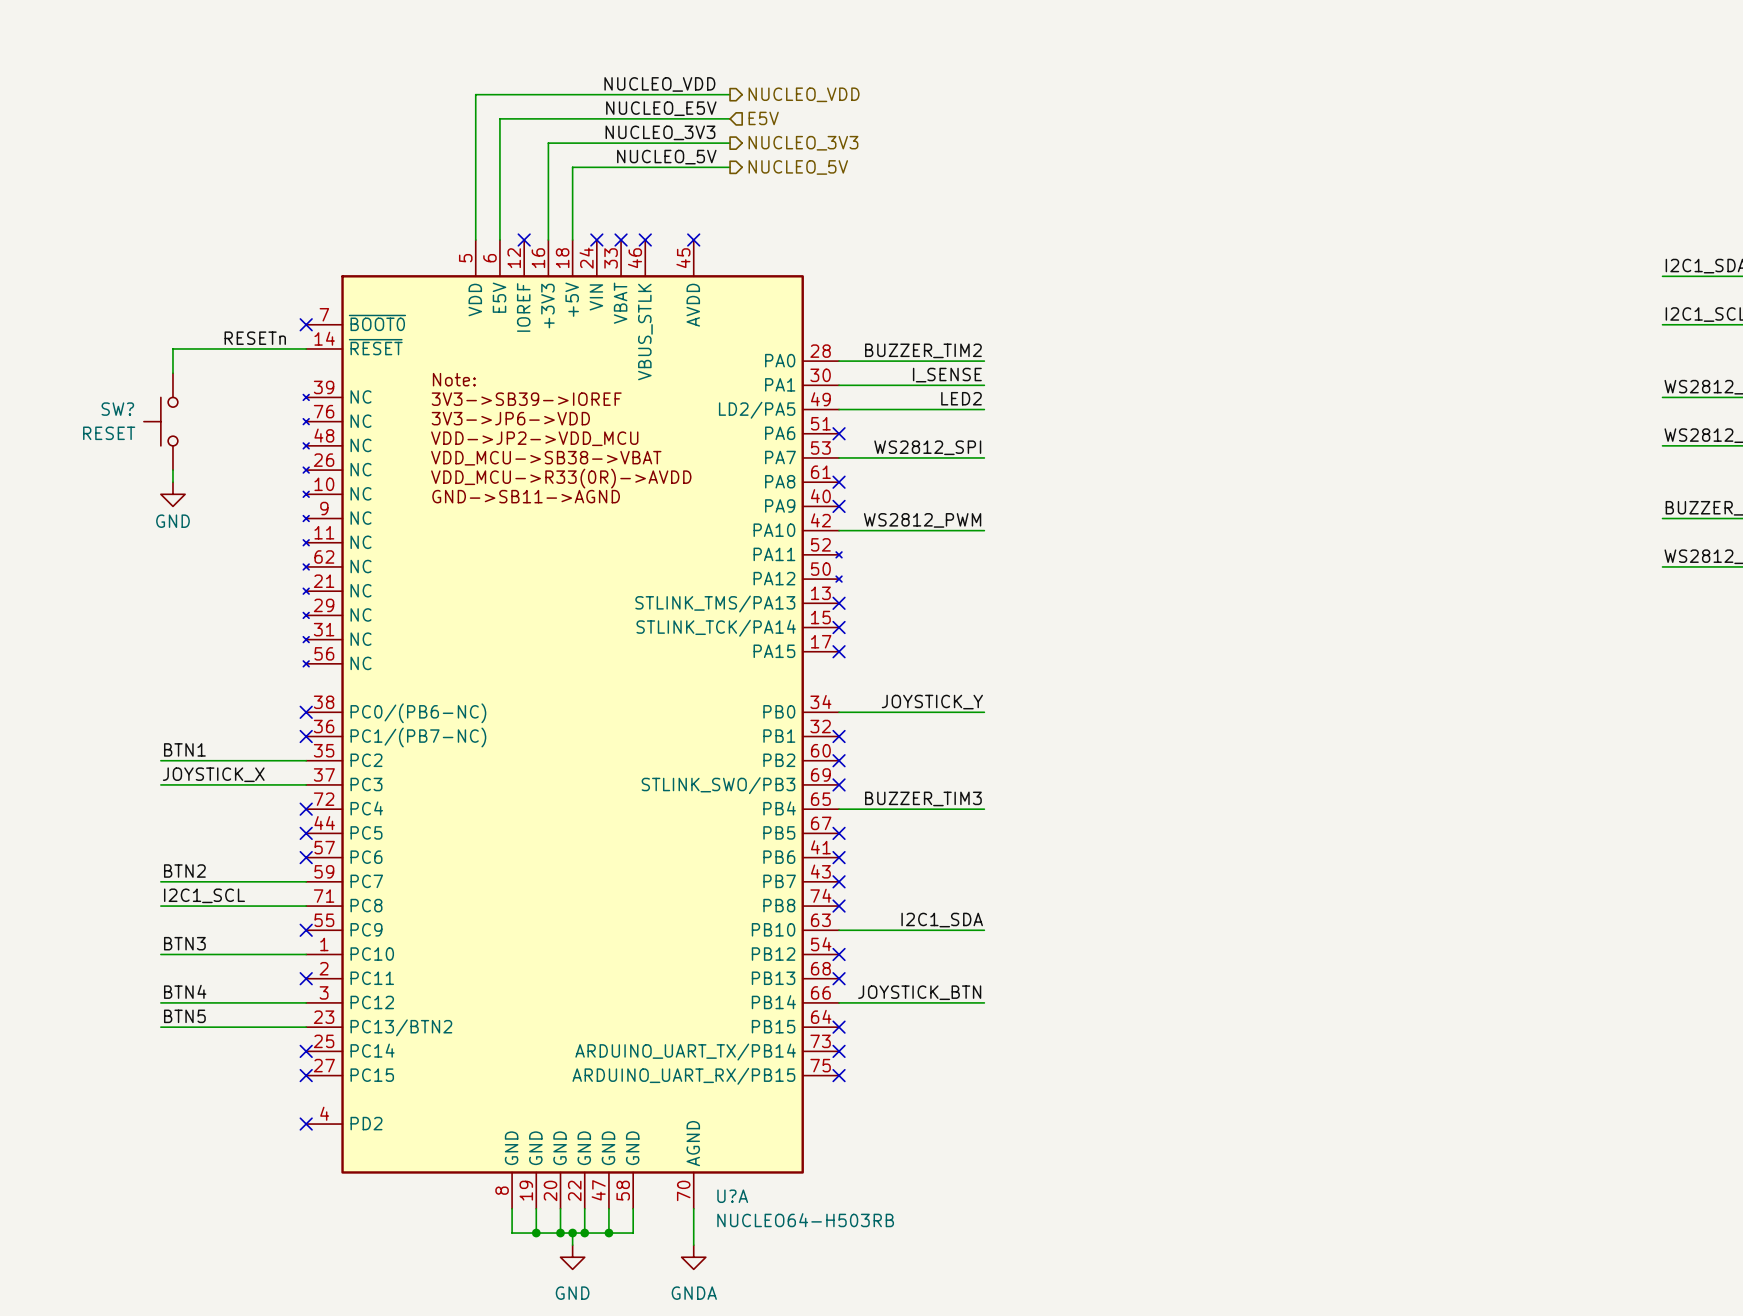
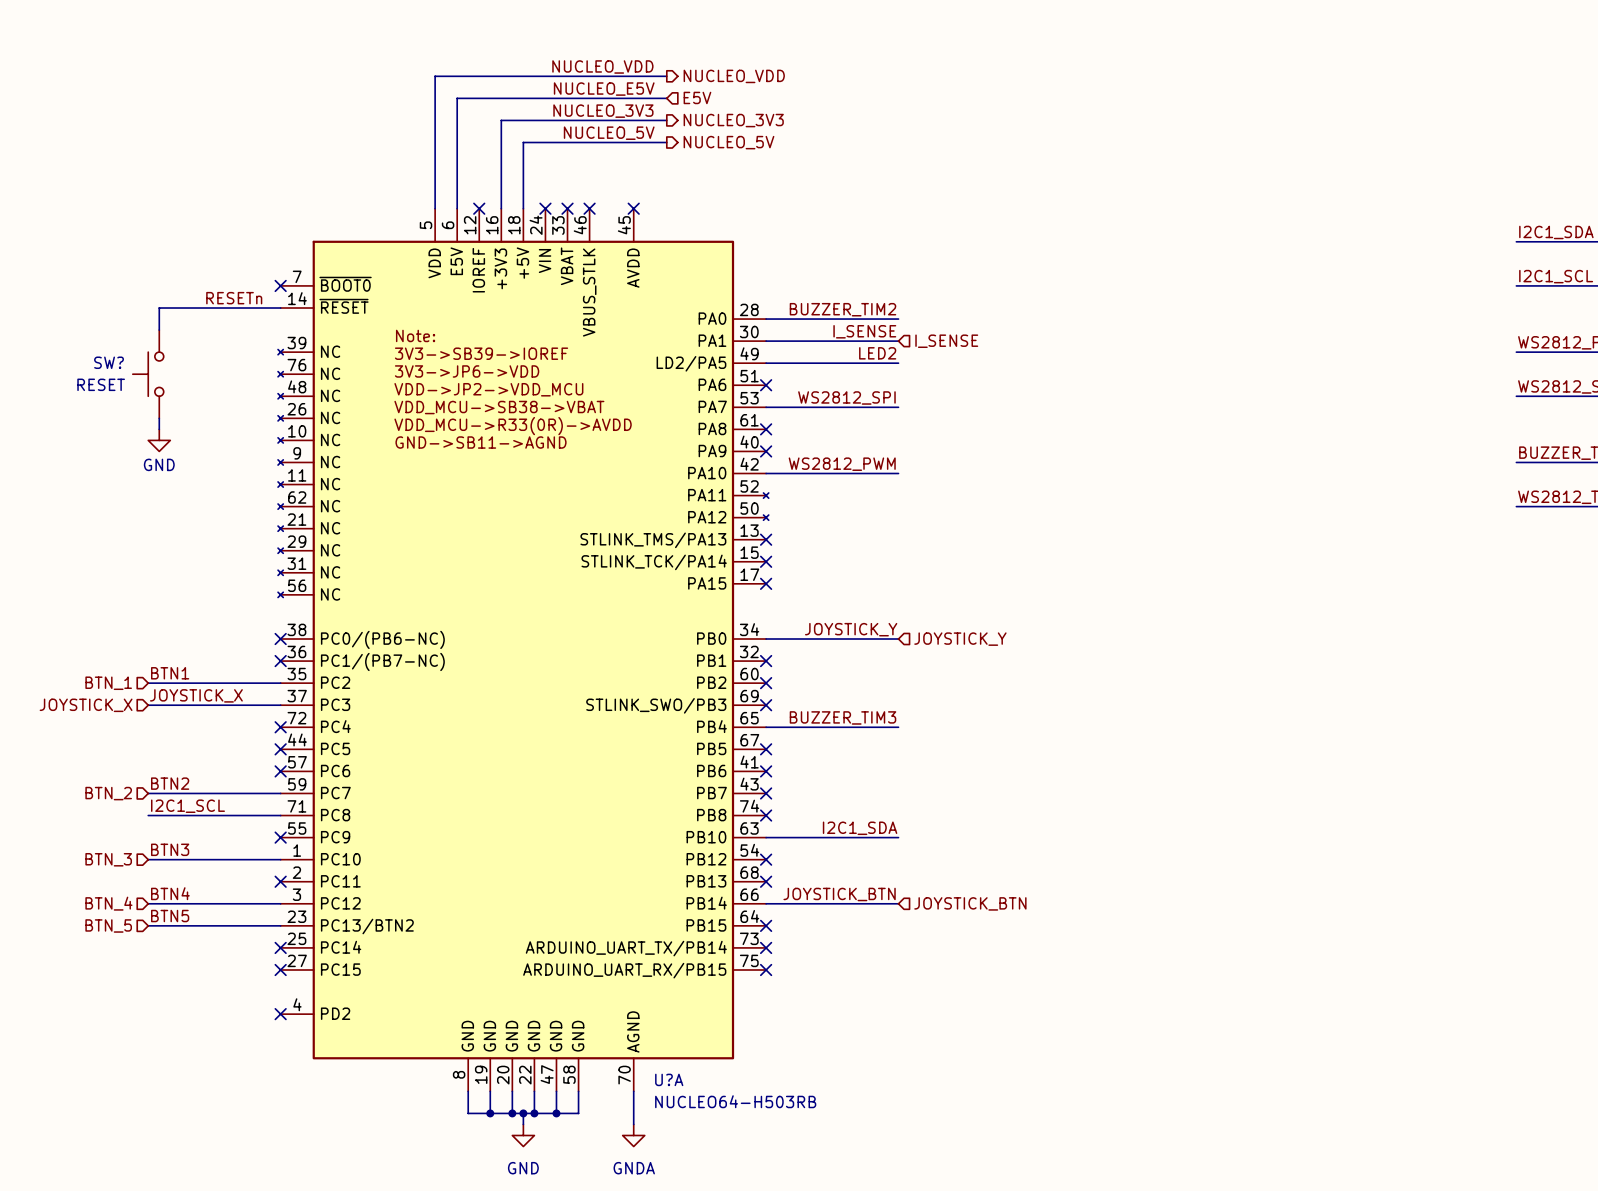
hierarchical label: none -> I_SENSE (946, 341)
hierarchical label: none -> JOYSTICK_Y (960, 639)
hierarchical label: none -> BTN_1 (108, 683)
hierarchical label: none -> JOYSTICK_X (86, 705)
hierarchical label: none -> BTN_2 (108, 793)
hierarchical label: none -> BTN_3 (108, 859)
hierarchical label: none -> BTN_4 (108, 903)
hierarchical label: none -> JOYSTICK_BTN (970, 903)
hierarchical label: none -> BTN_5 (108, 925)

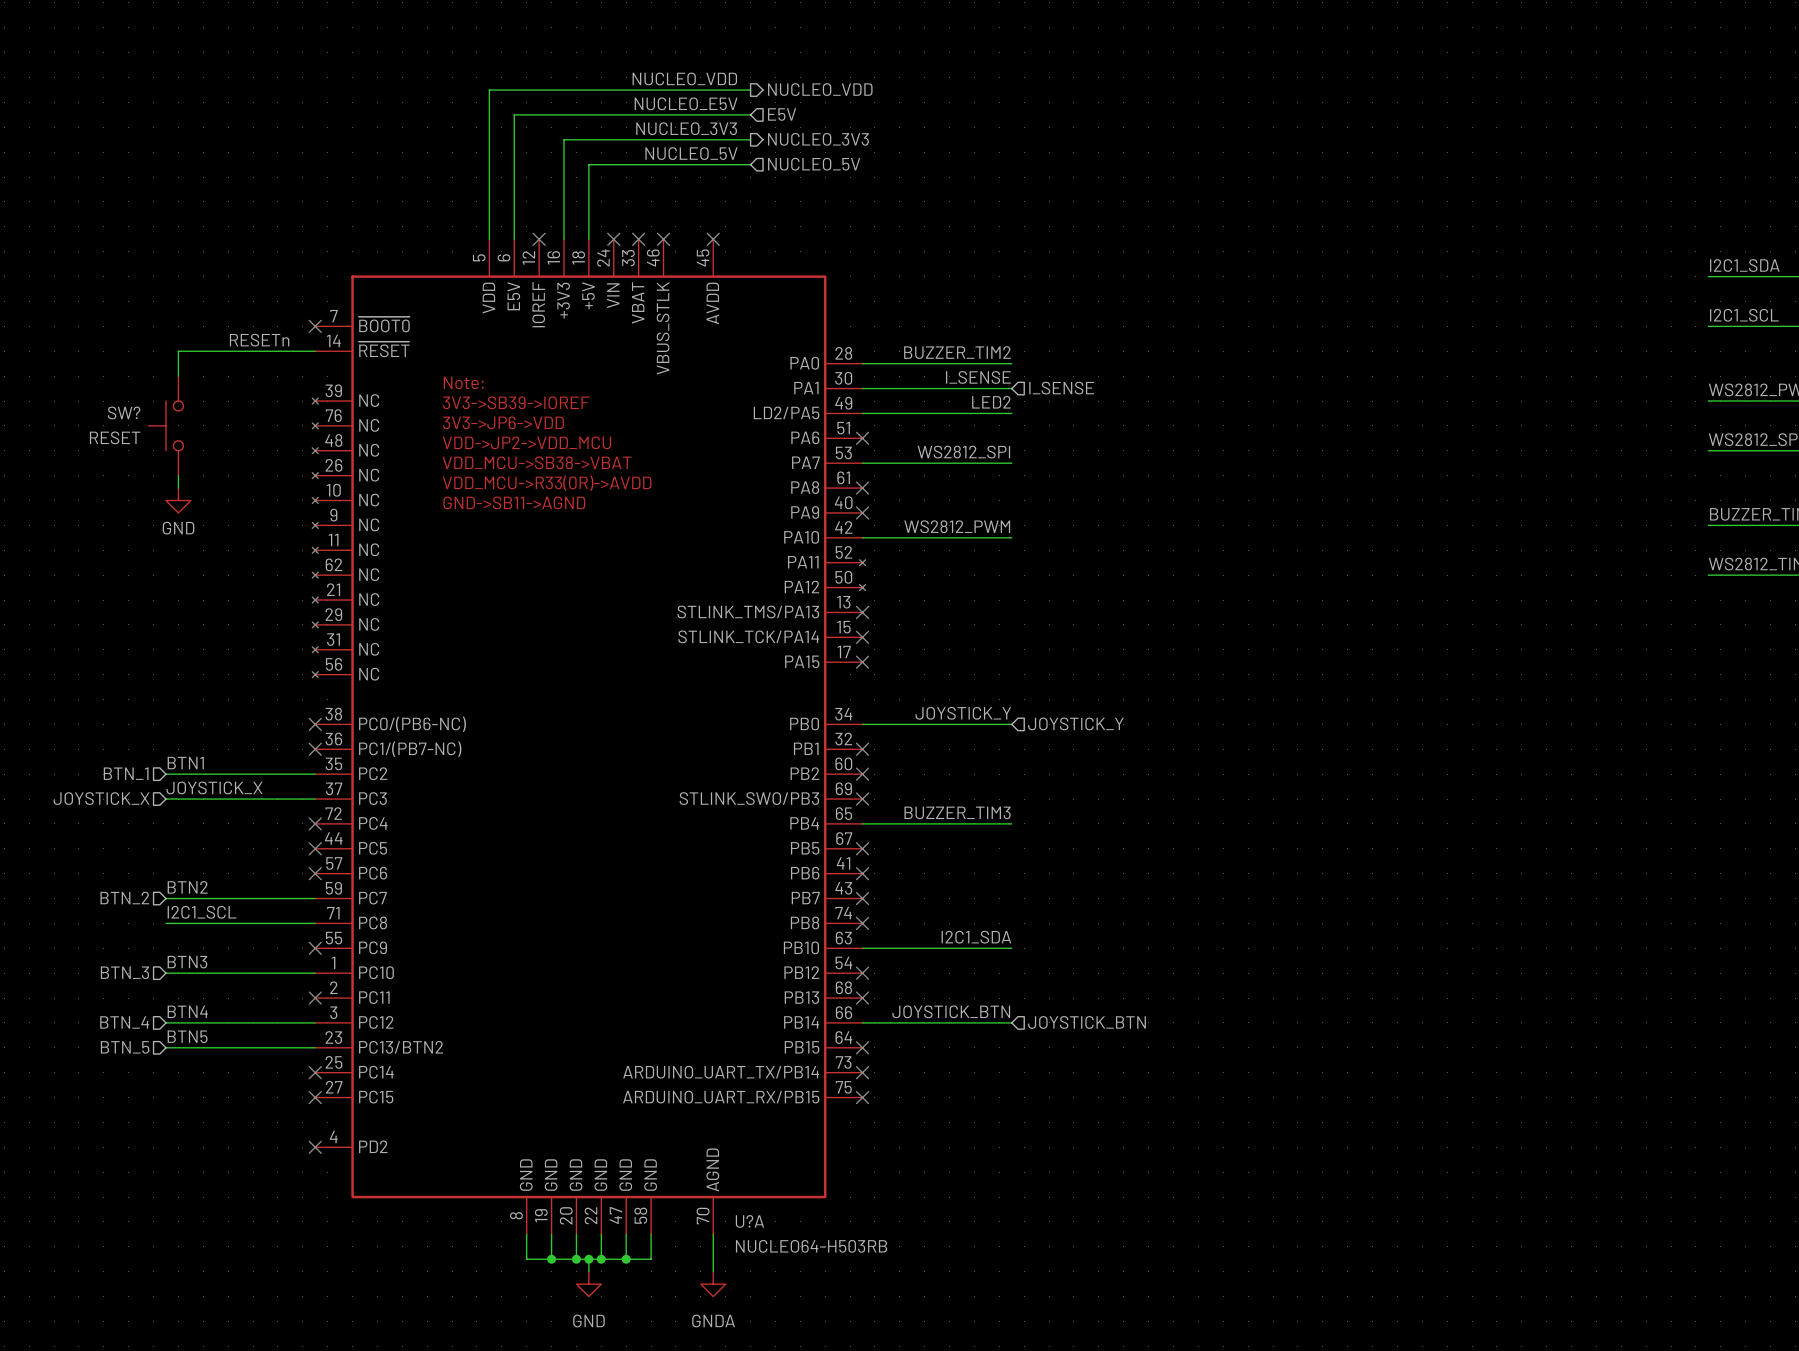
hierarchical label shape: output (728, 142) -> input (814, 164)

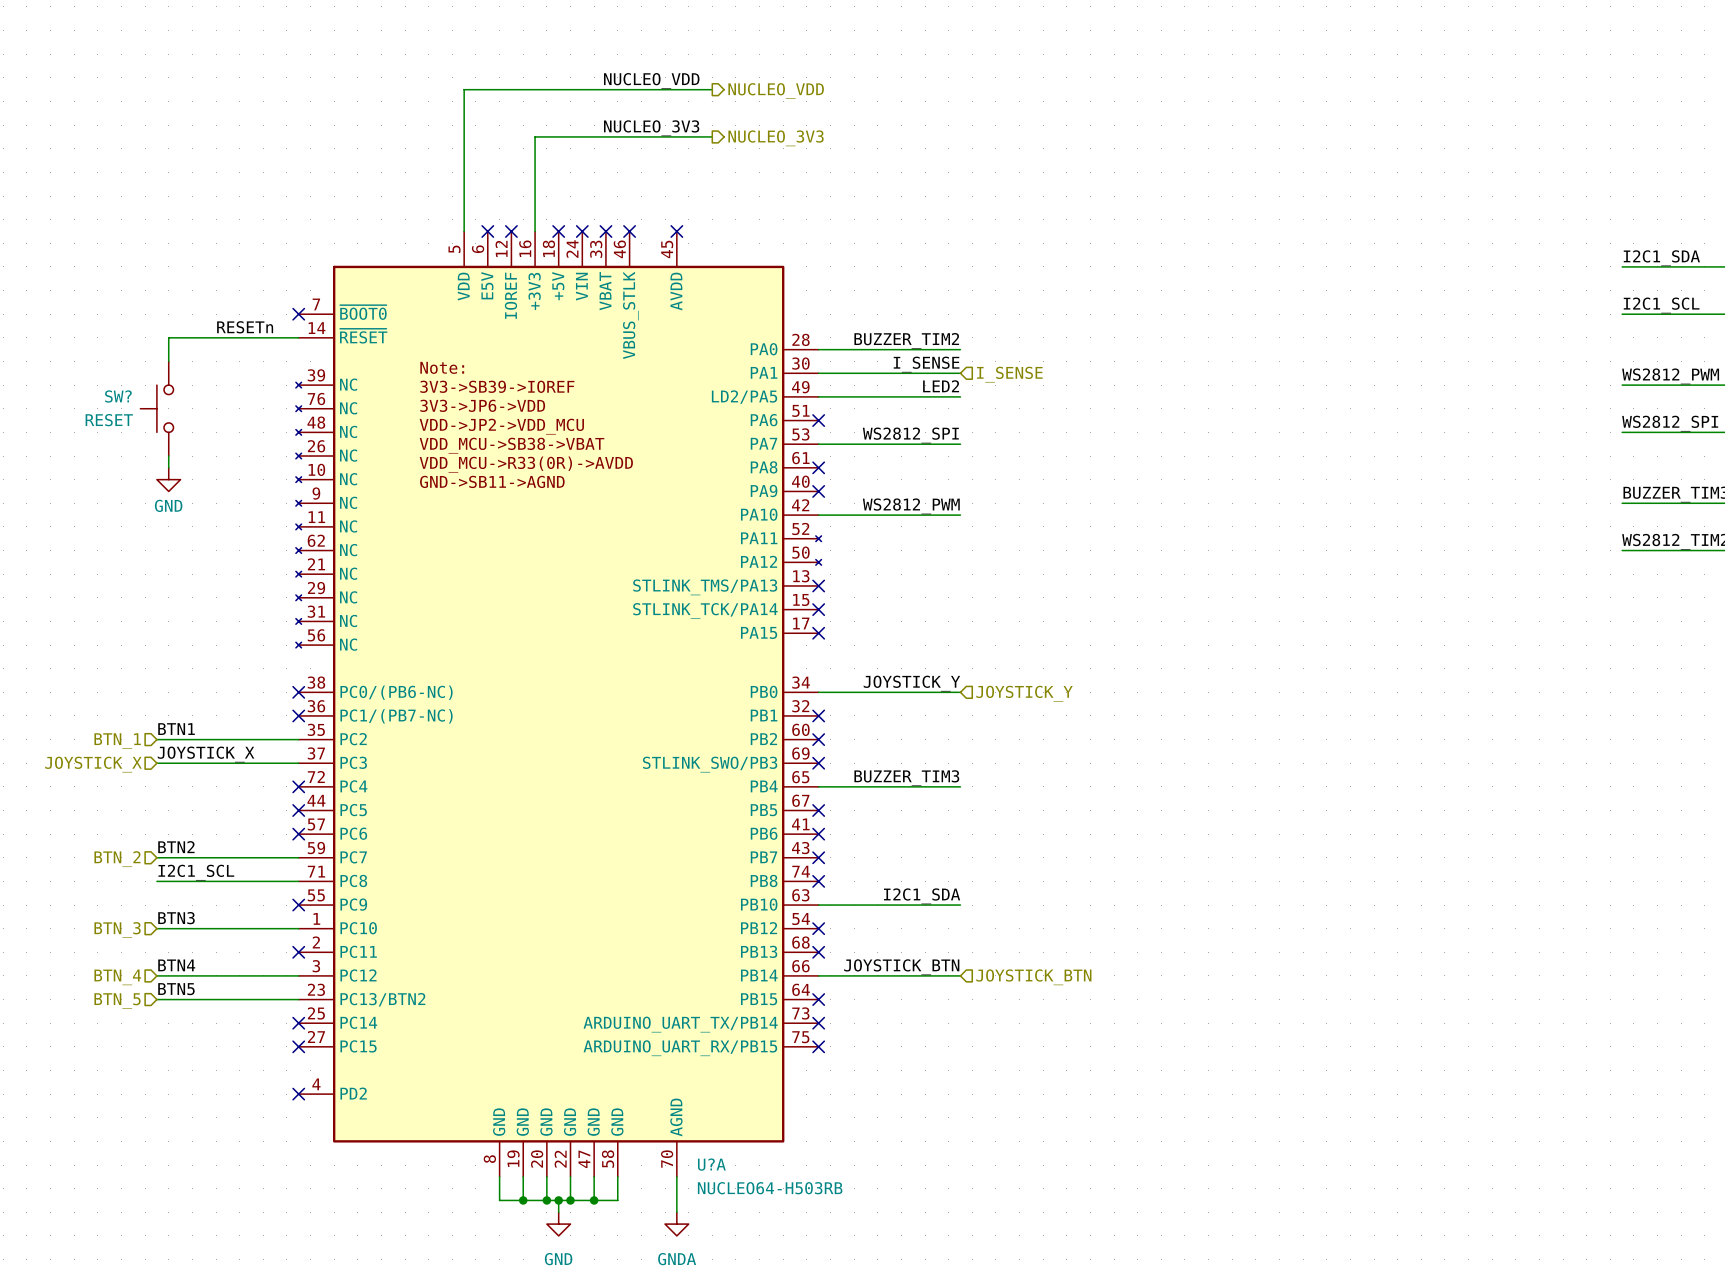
label: NUCLEO_E5V (686, 103) -> none
wire: (750, 114) (514, 114) (514, 239) -> none
hierarchical label: E5V (782, 114) -> none
label: NUCLEO_5V (691, 153) -> none
wire: (750, 164) (588, 164) (588, 239) -> none
hierarchical label: NUCLEO_5V (814, 164) -> none
no-connect mark: none -> (487, 231)
no-connect mark: none -> (558, 231)

